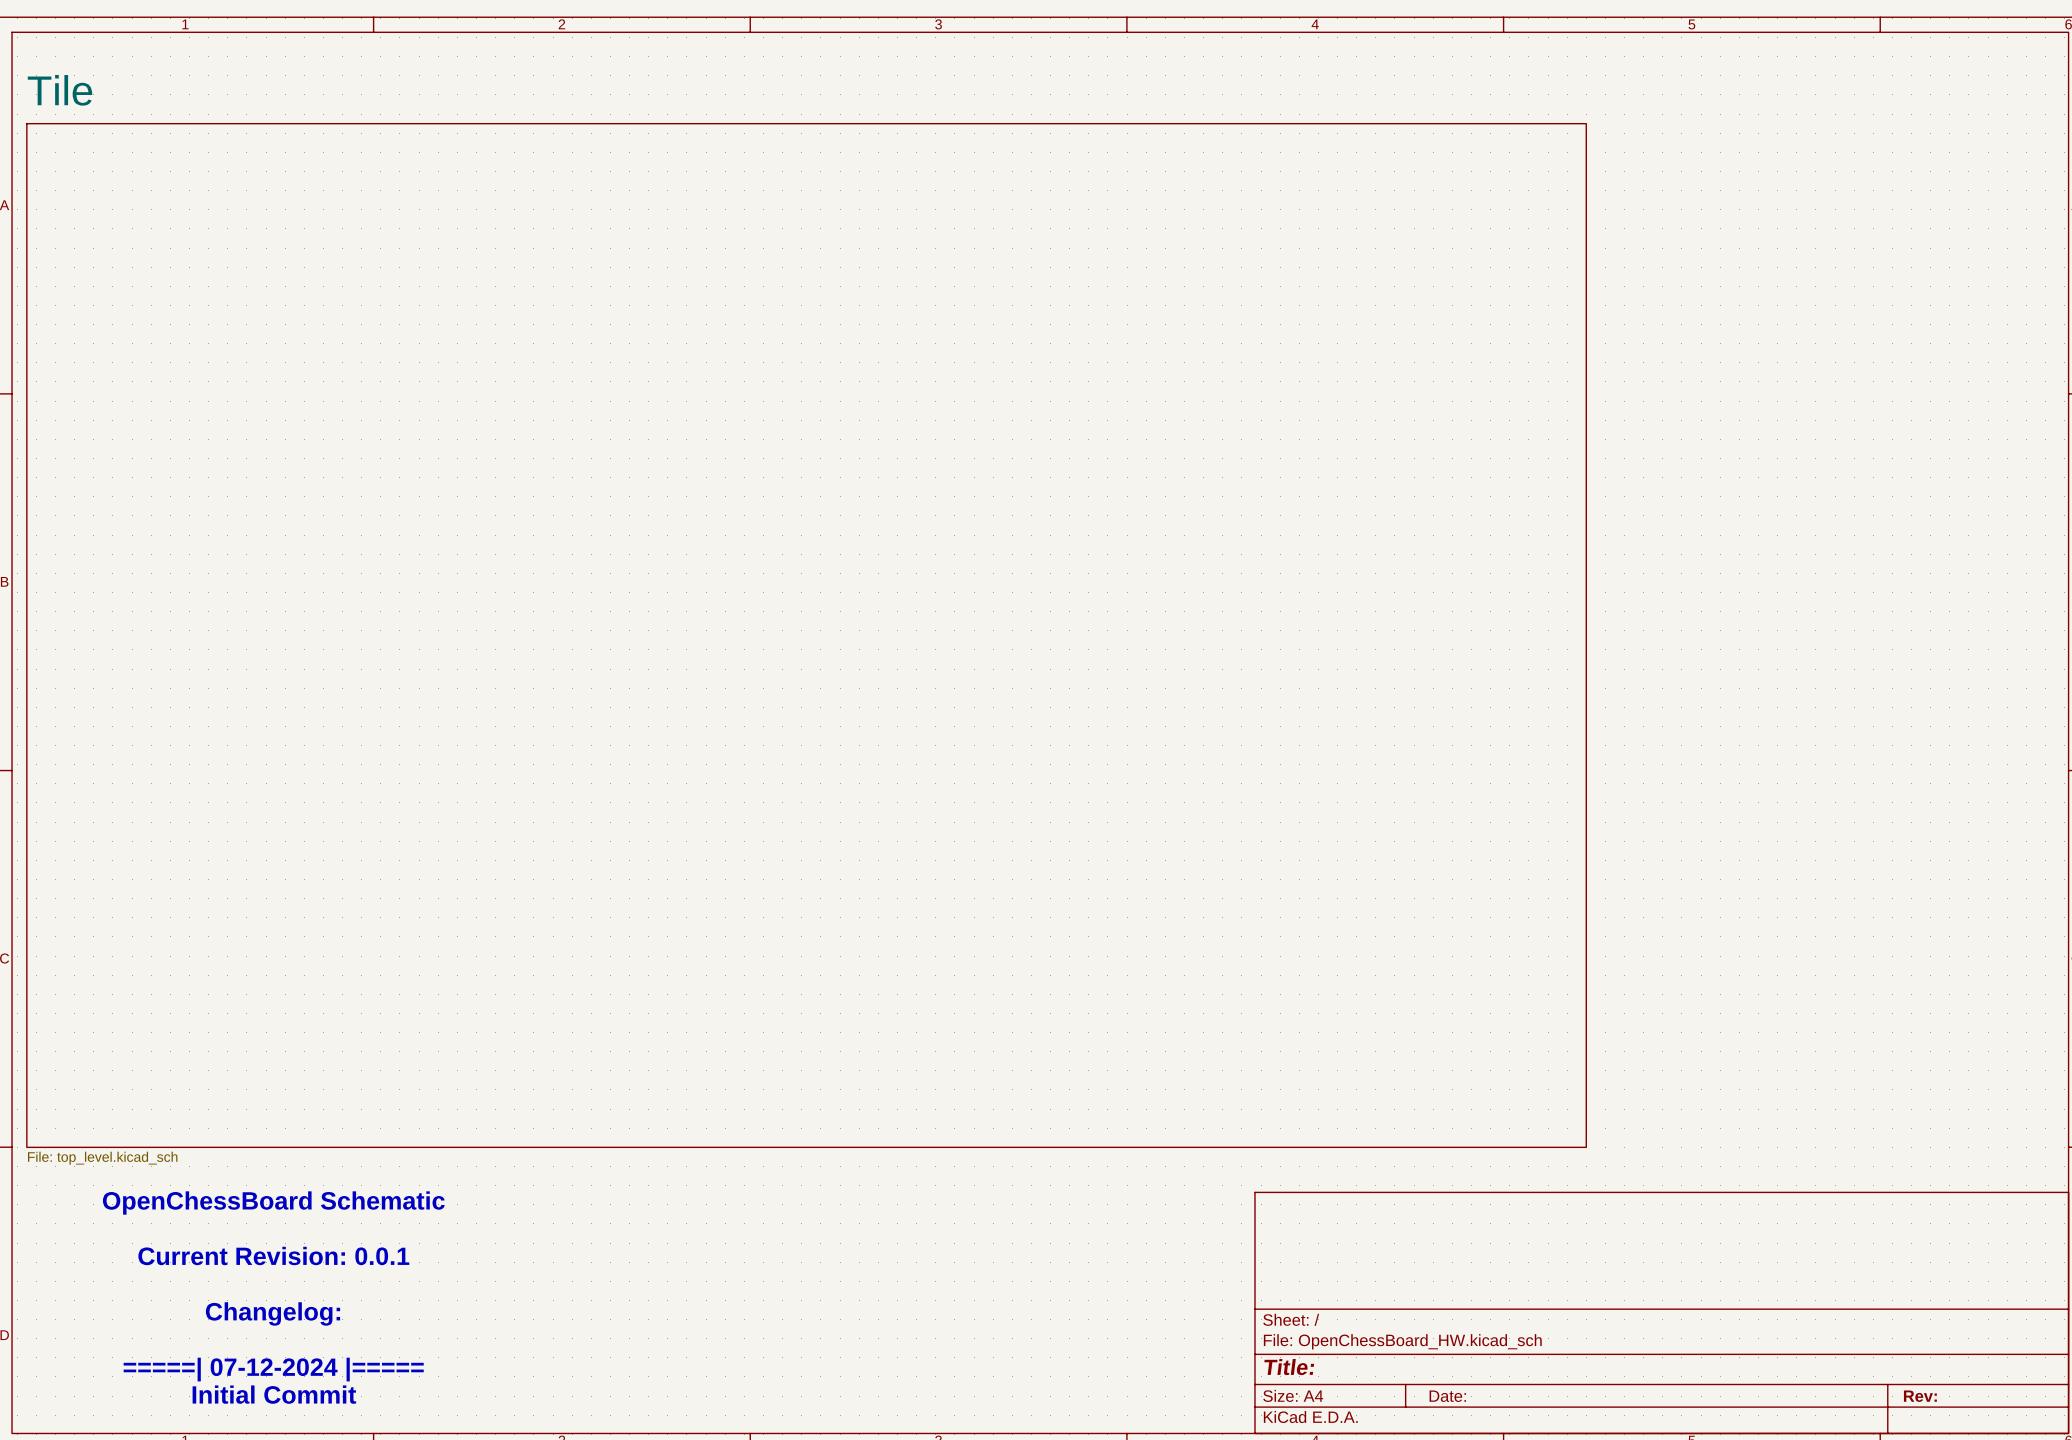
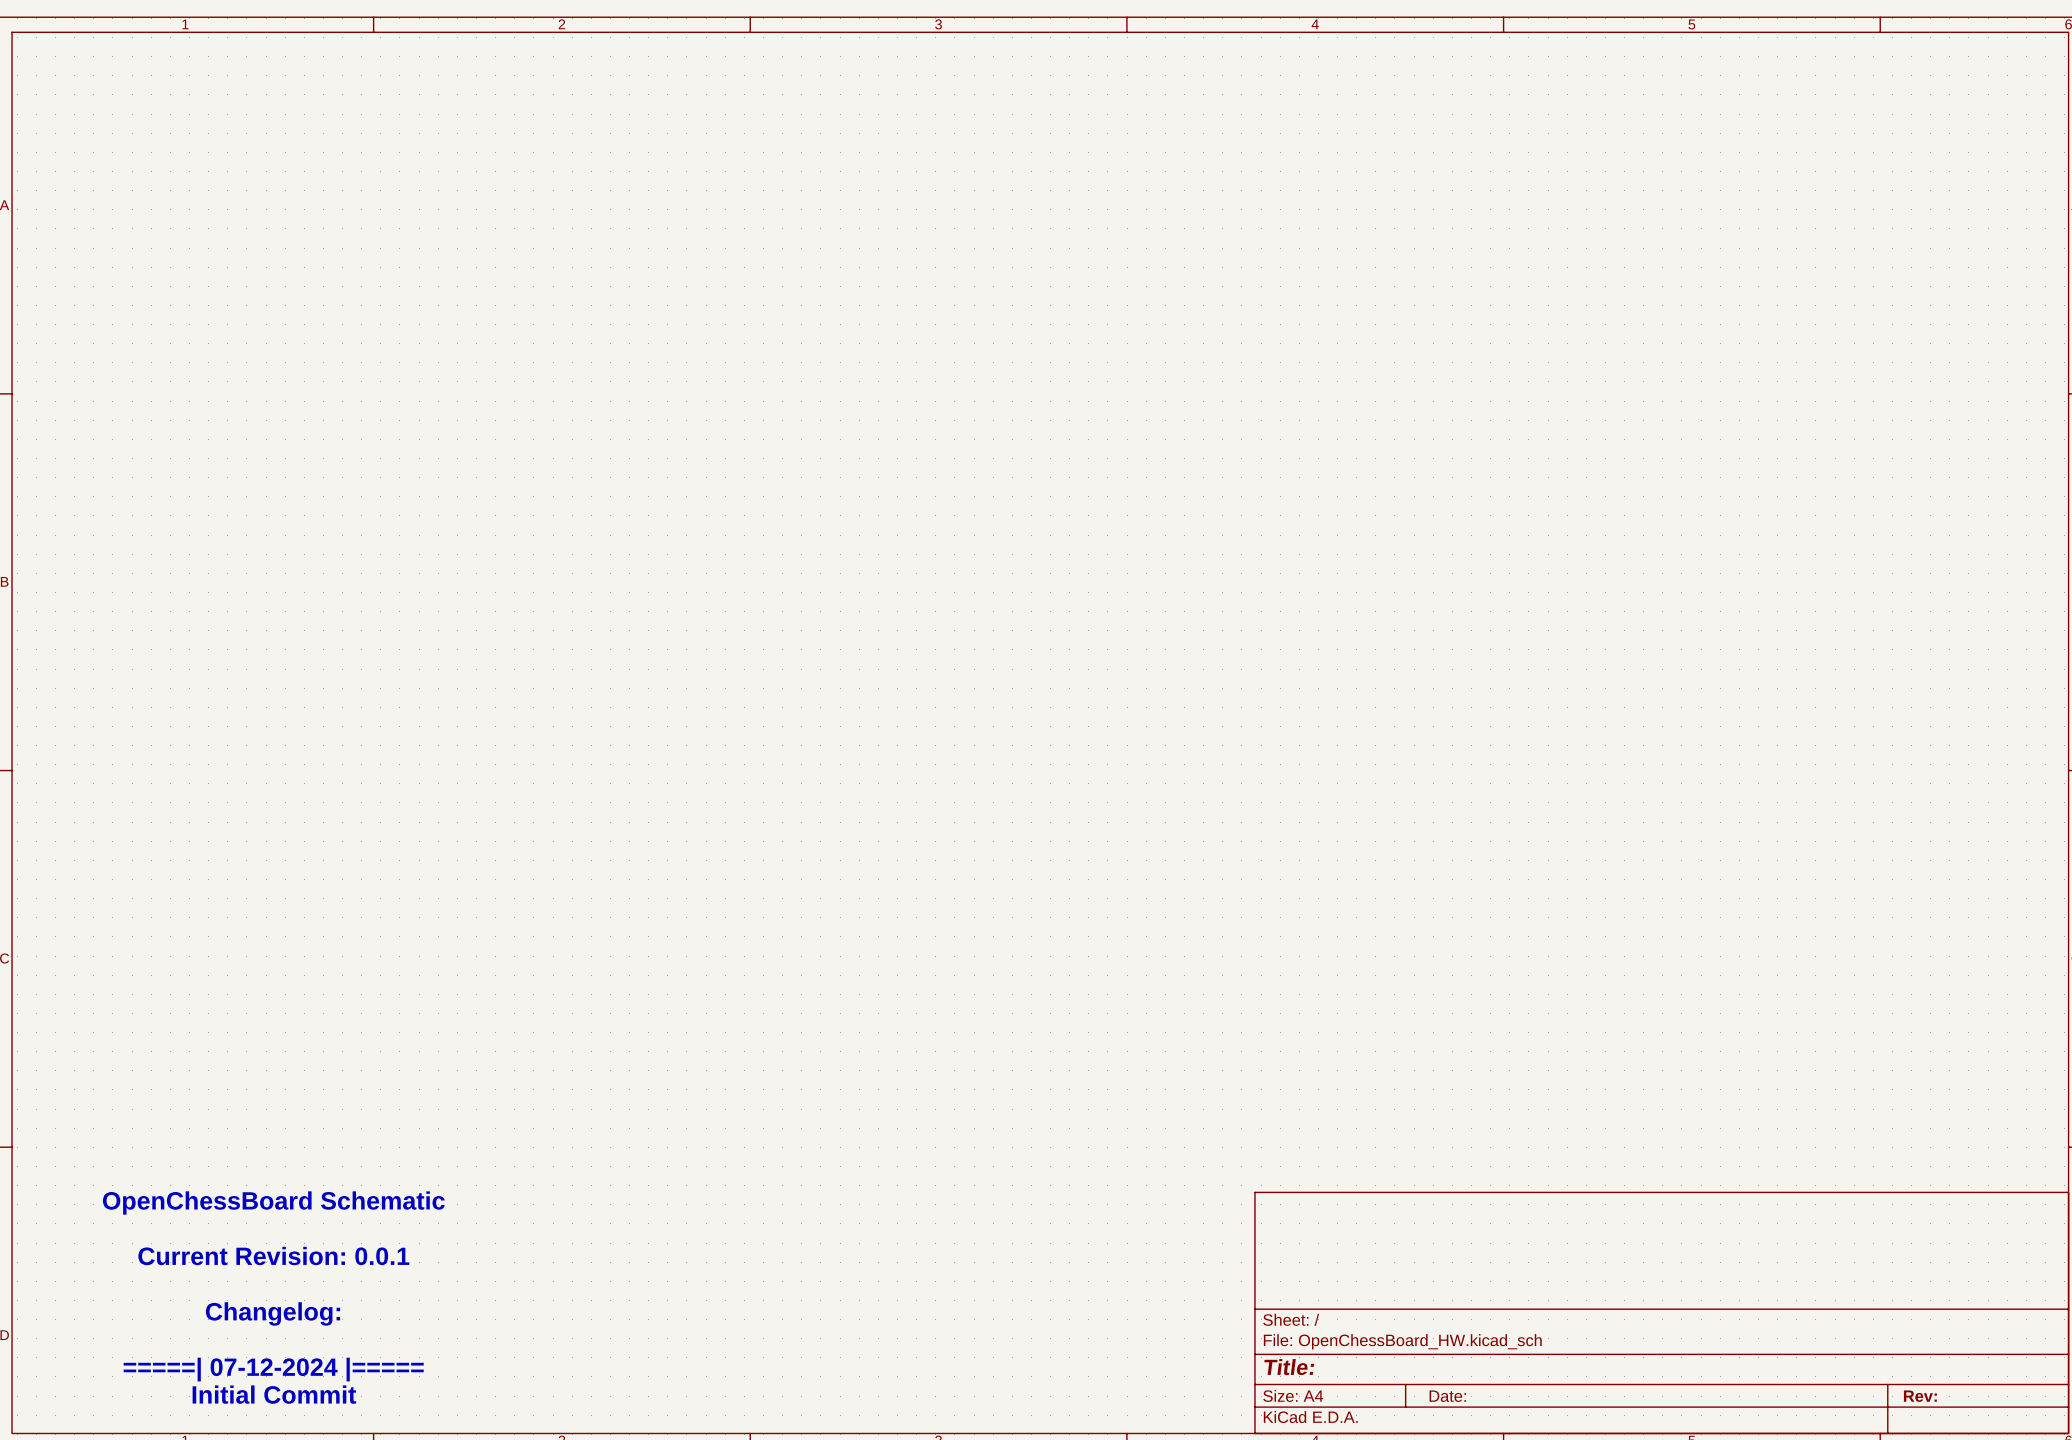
sheet Tile: File: top_level.kicad_sch (806, 635) -> none

